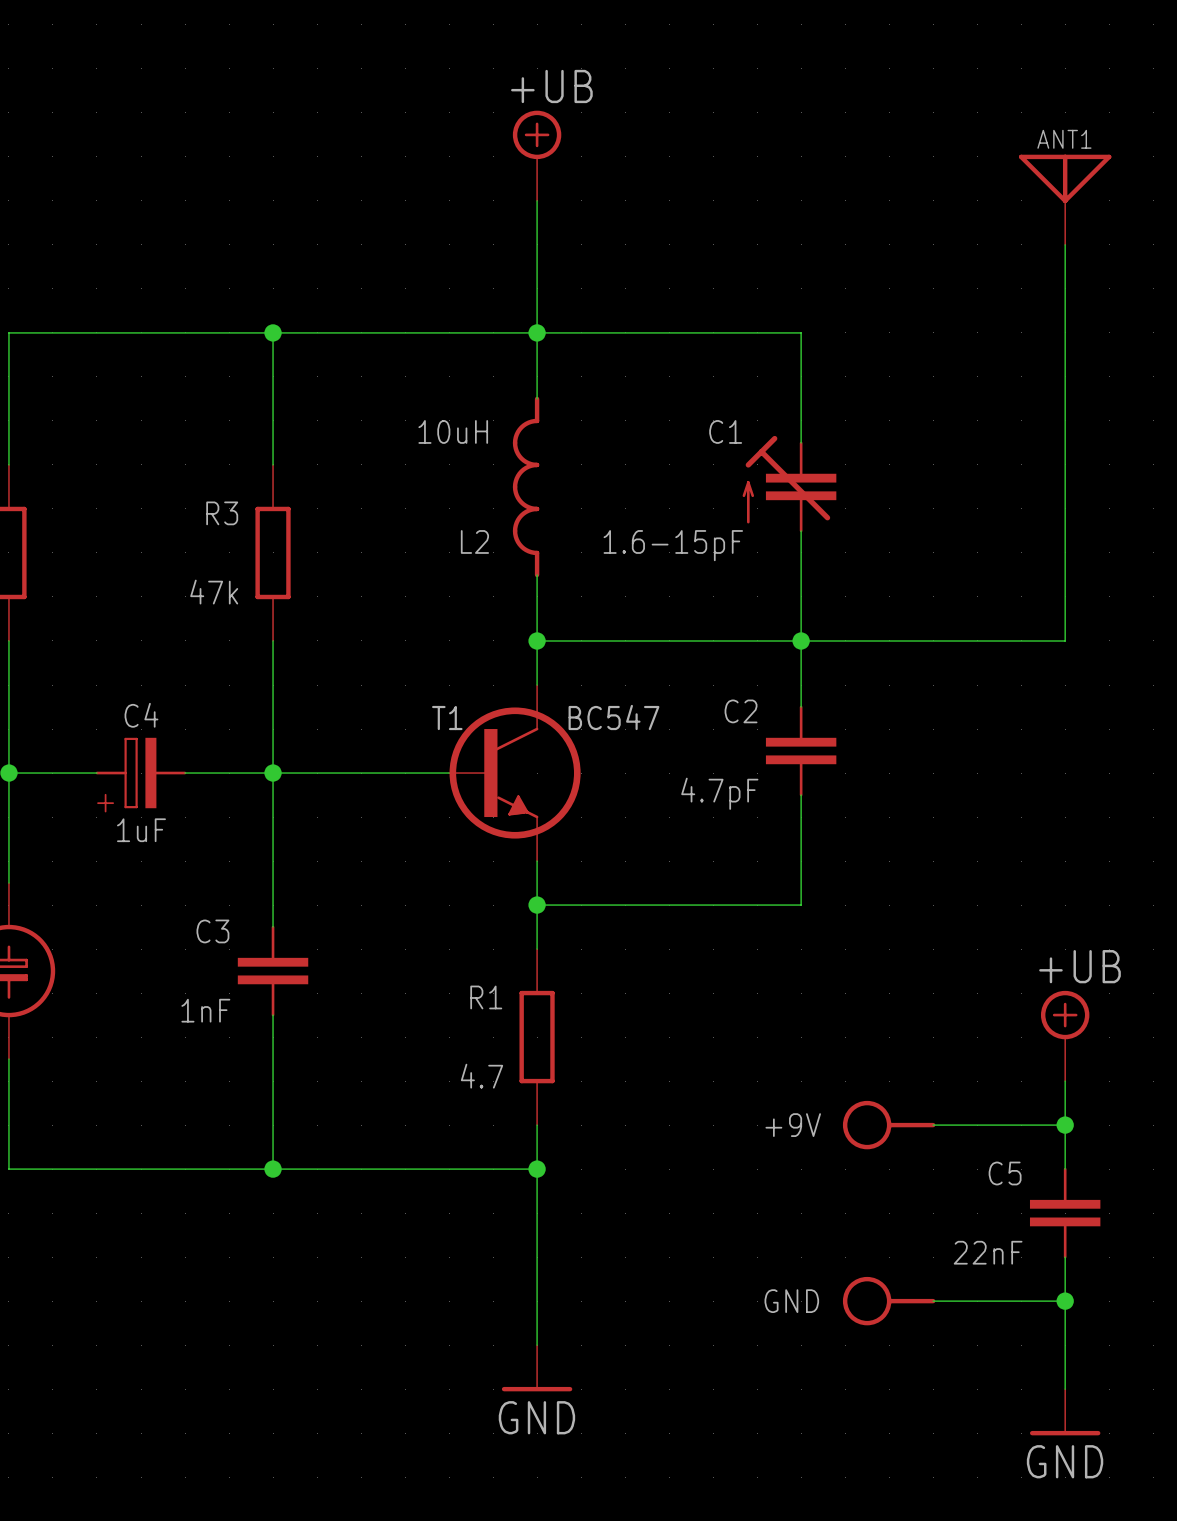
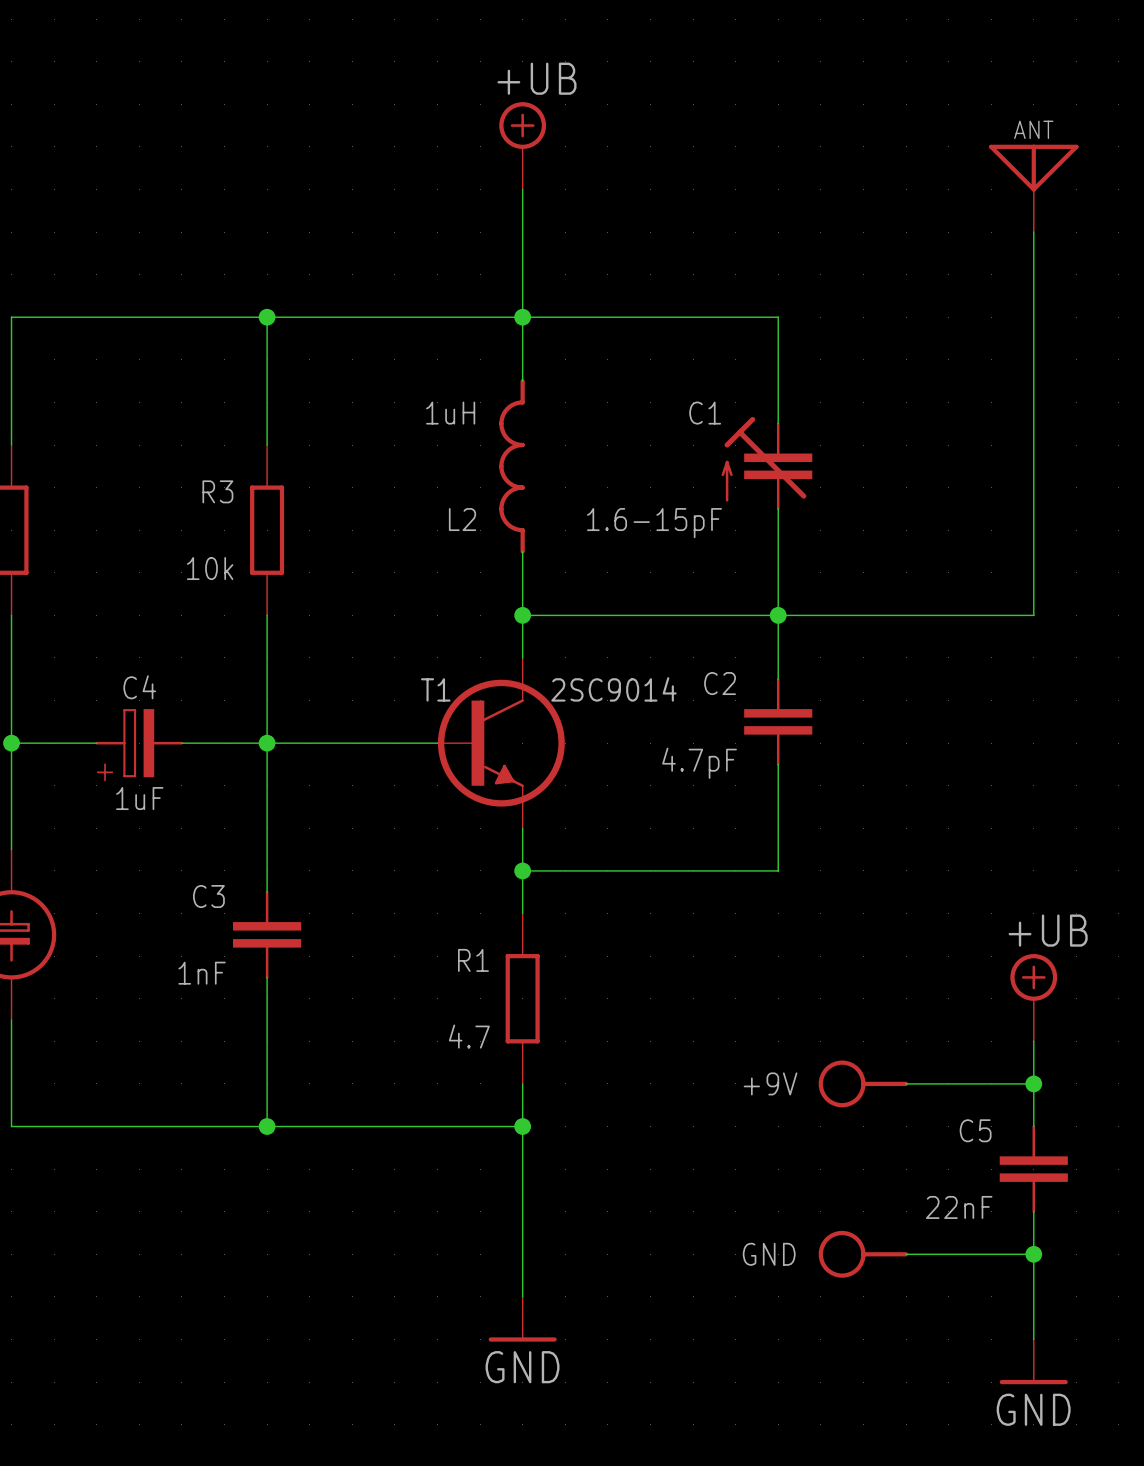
ANT1 name: ANT1 (1064, 139) -> ANT (1033, 129)
L2 value: 10uH (453, 431) -> 1uH (450, 413)
R3 value: 47k (214, 592) -> 10k (210, 568)
T1 value: BC547 (613, 717) -> 2SC9014 (613, 689)

